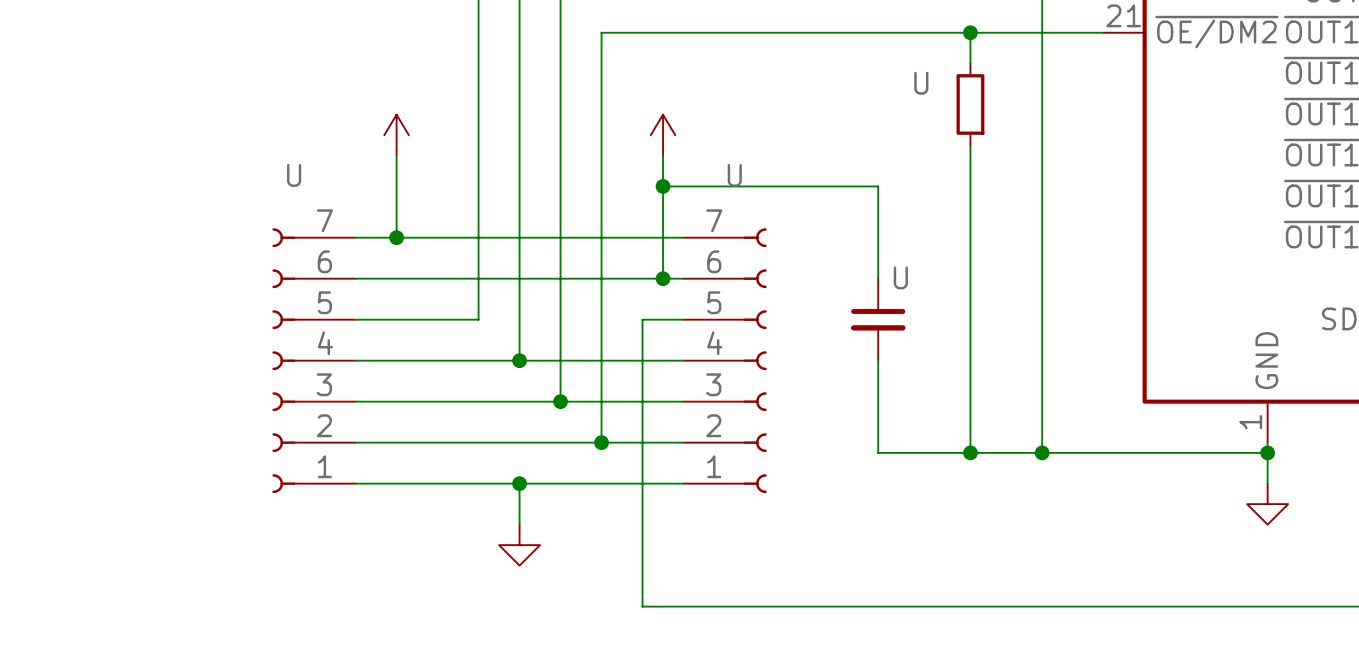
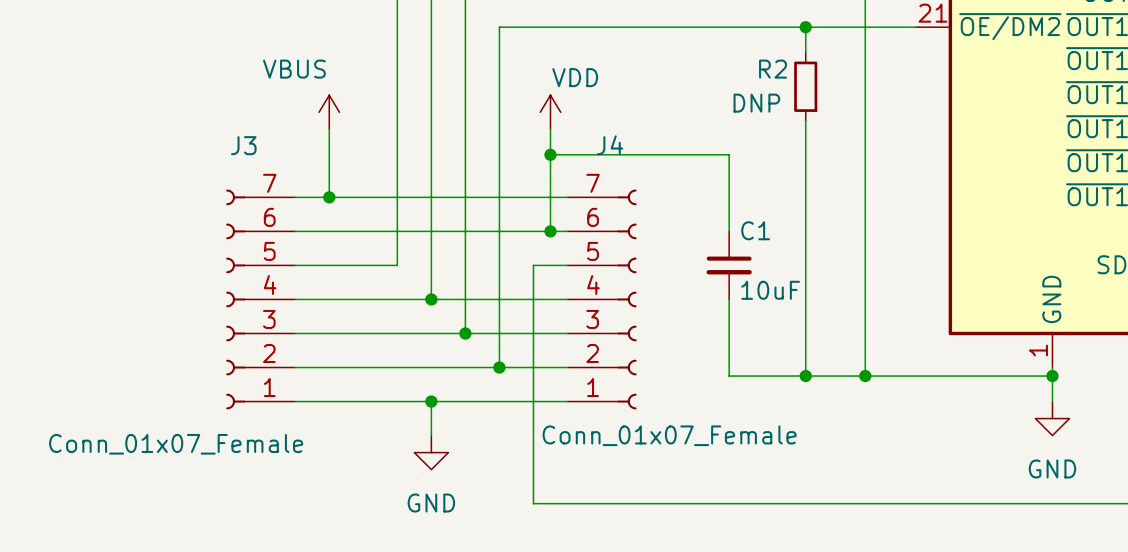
power symbol text: none -> VBUS (294, 69)
U name: U (921, 83) -> R2 (773, 69)
power symbol text: none -> VDD (575, 77)
U value: none -> DNP (756, 103)
U name: U (294, 175) -> J3 (243, 145)
U name: U (734, 175) -> J4 (610, 145)
U name: U (900, 277) -> C1 (755, 230)
U value: none -> 10uF (770, 290)
U value: none -> Conn_01x07_Female (669, 435)
U value: none -> Conn_01x07_Female (176, 444)
power symbol text: none -> GND (1052, 468)
power symbol text: none -> GND (431, 503)

